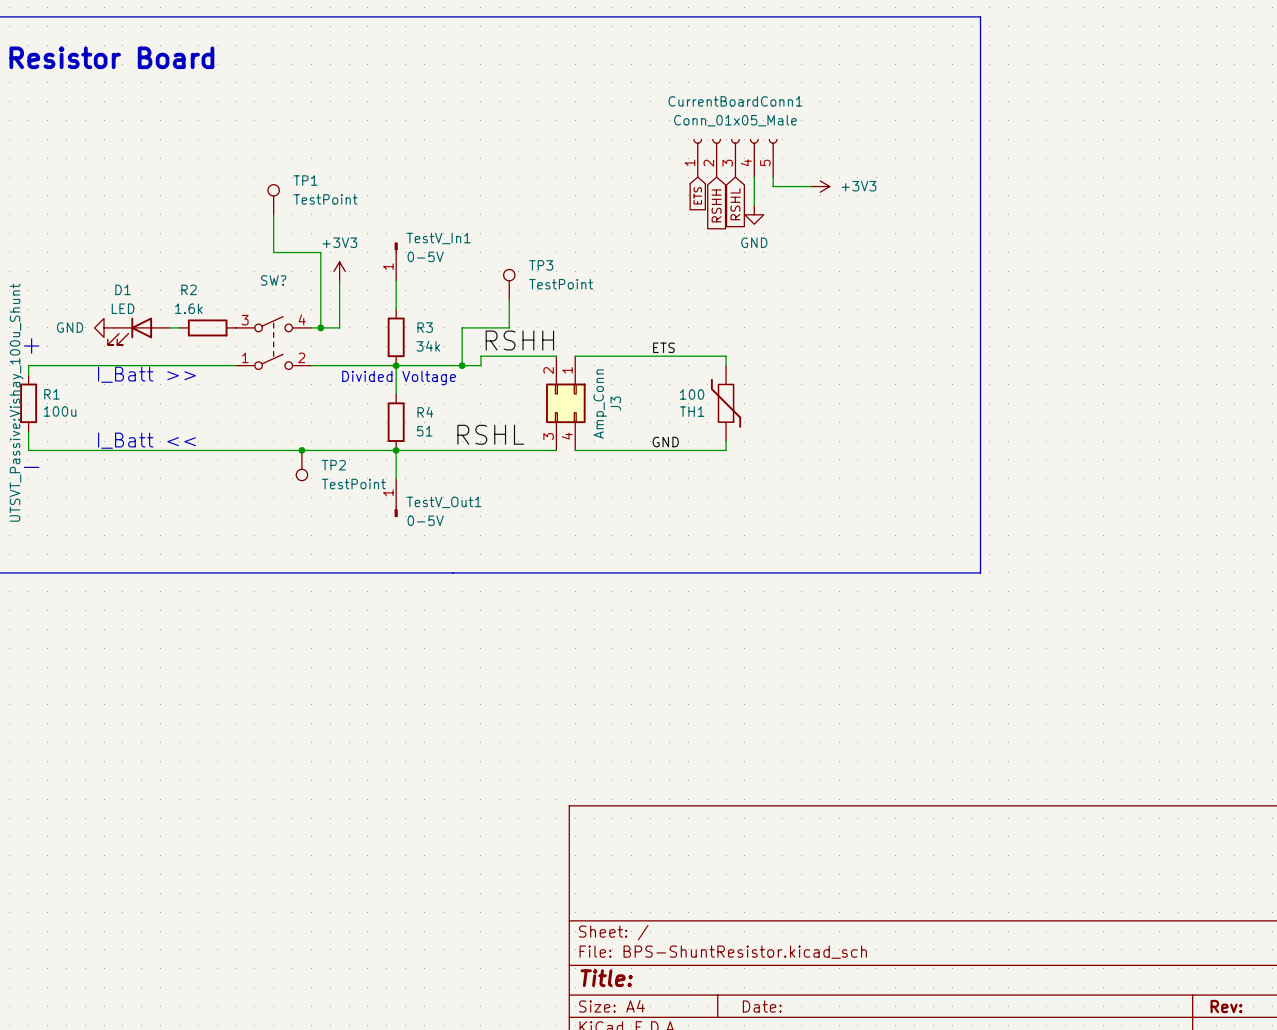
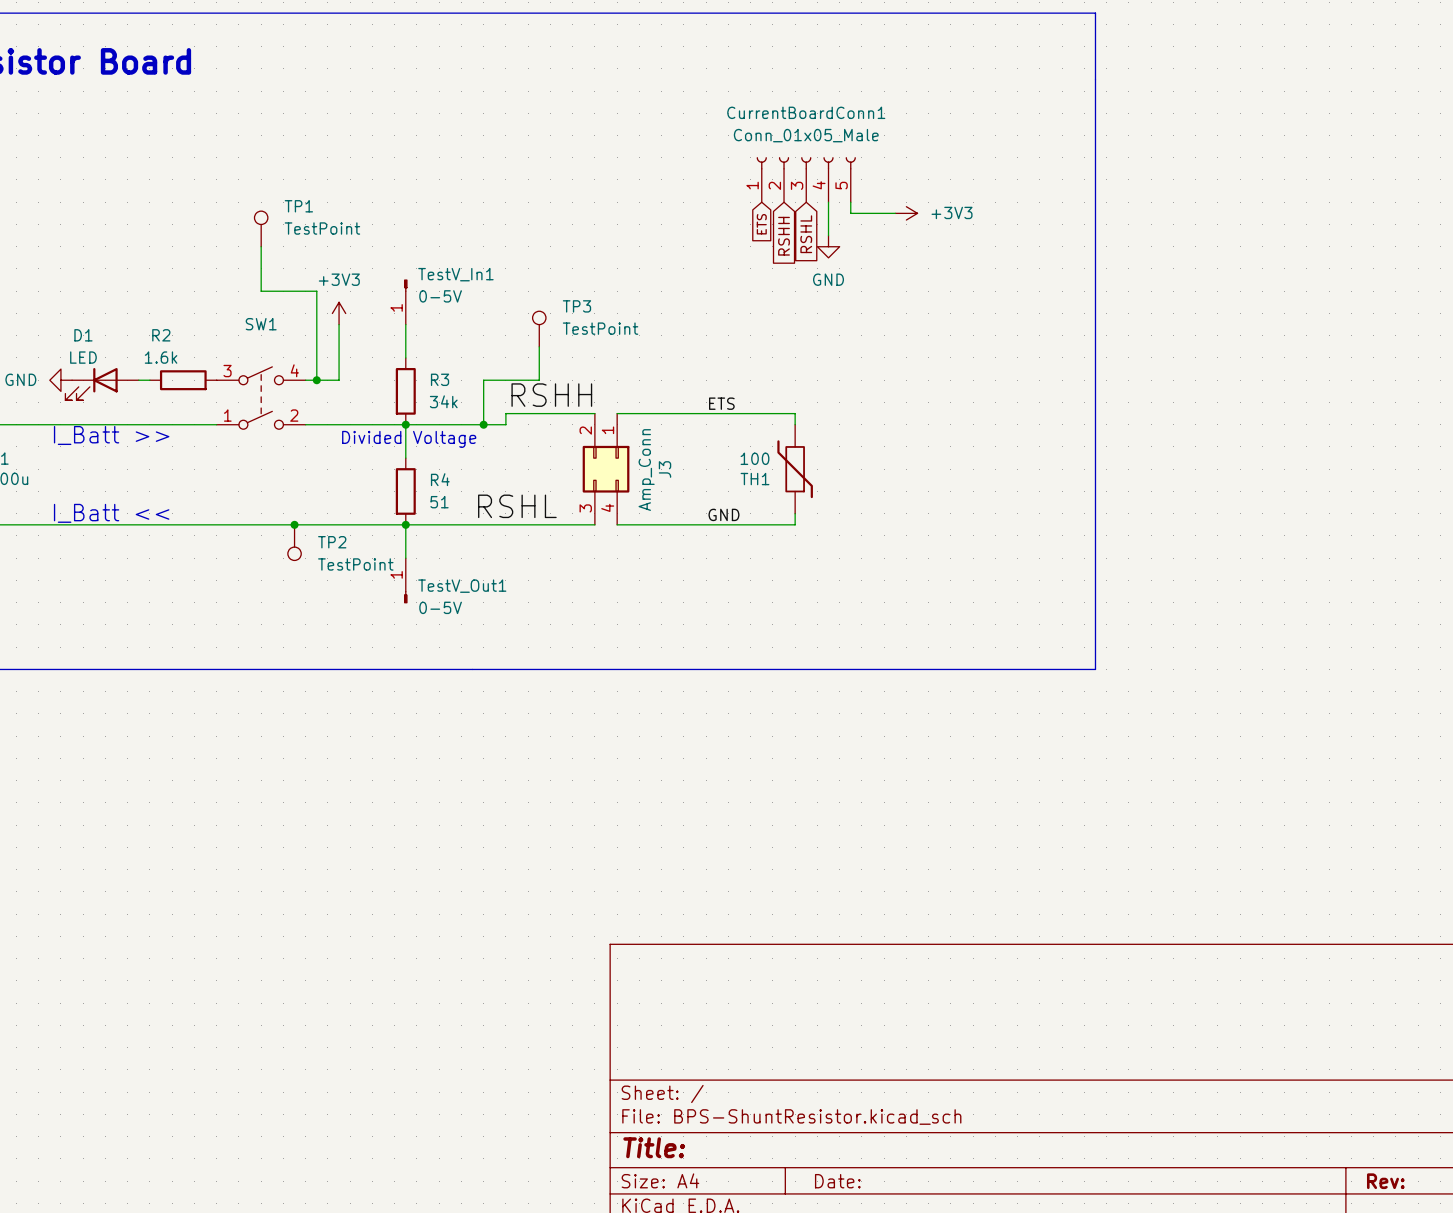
SW? name: SW? (273, 280) -> SW1 (261, 324)

